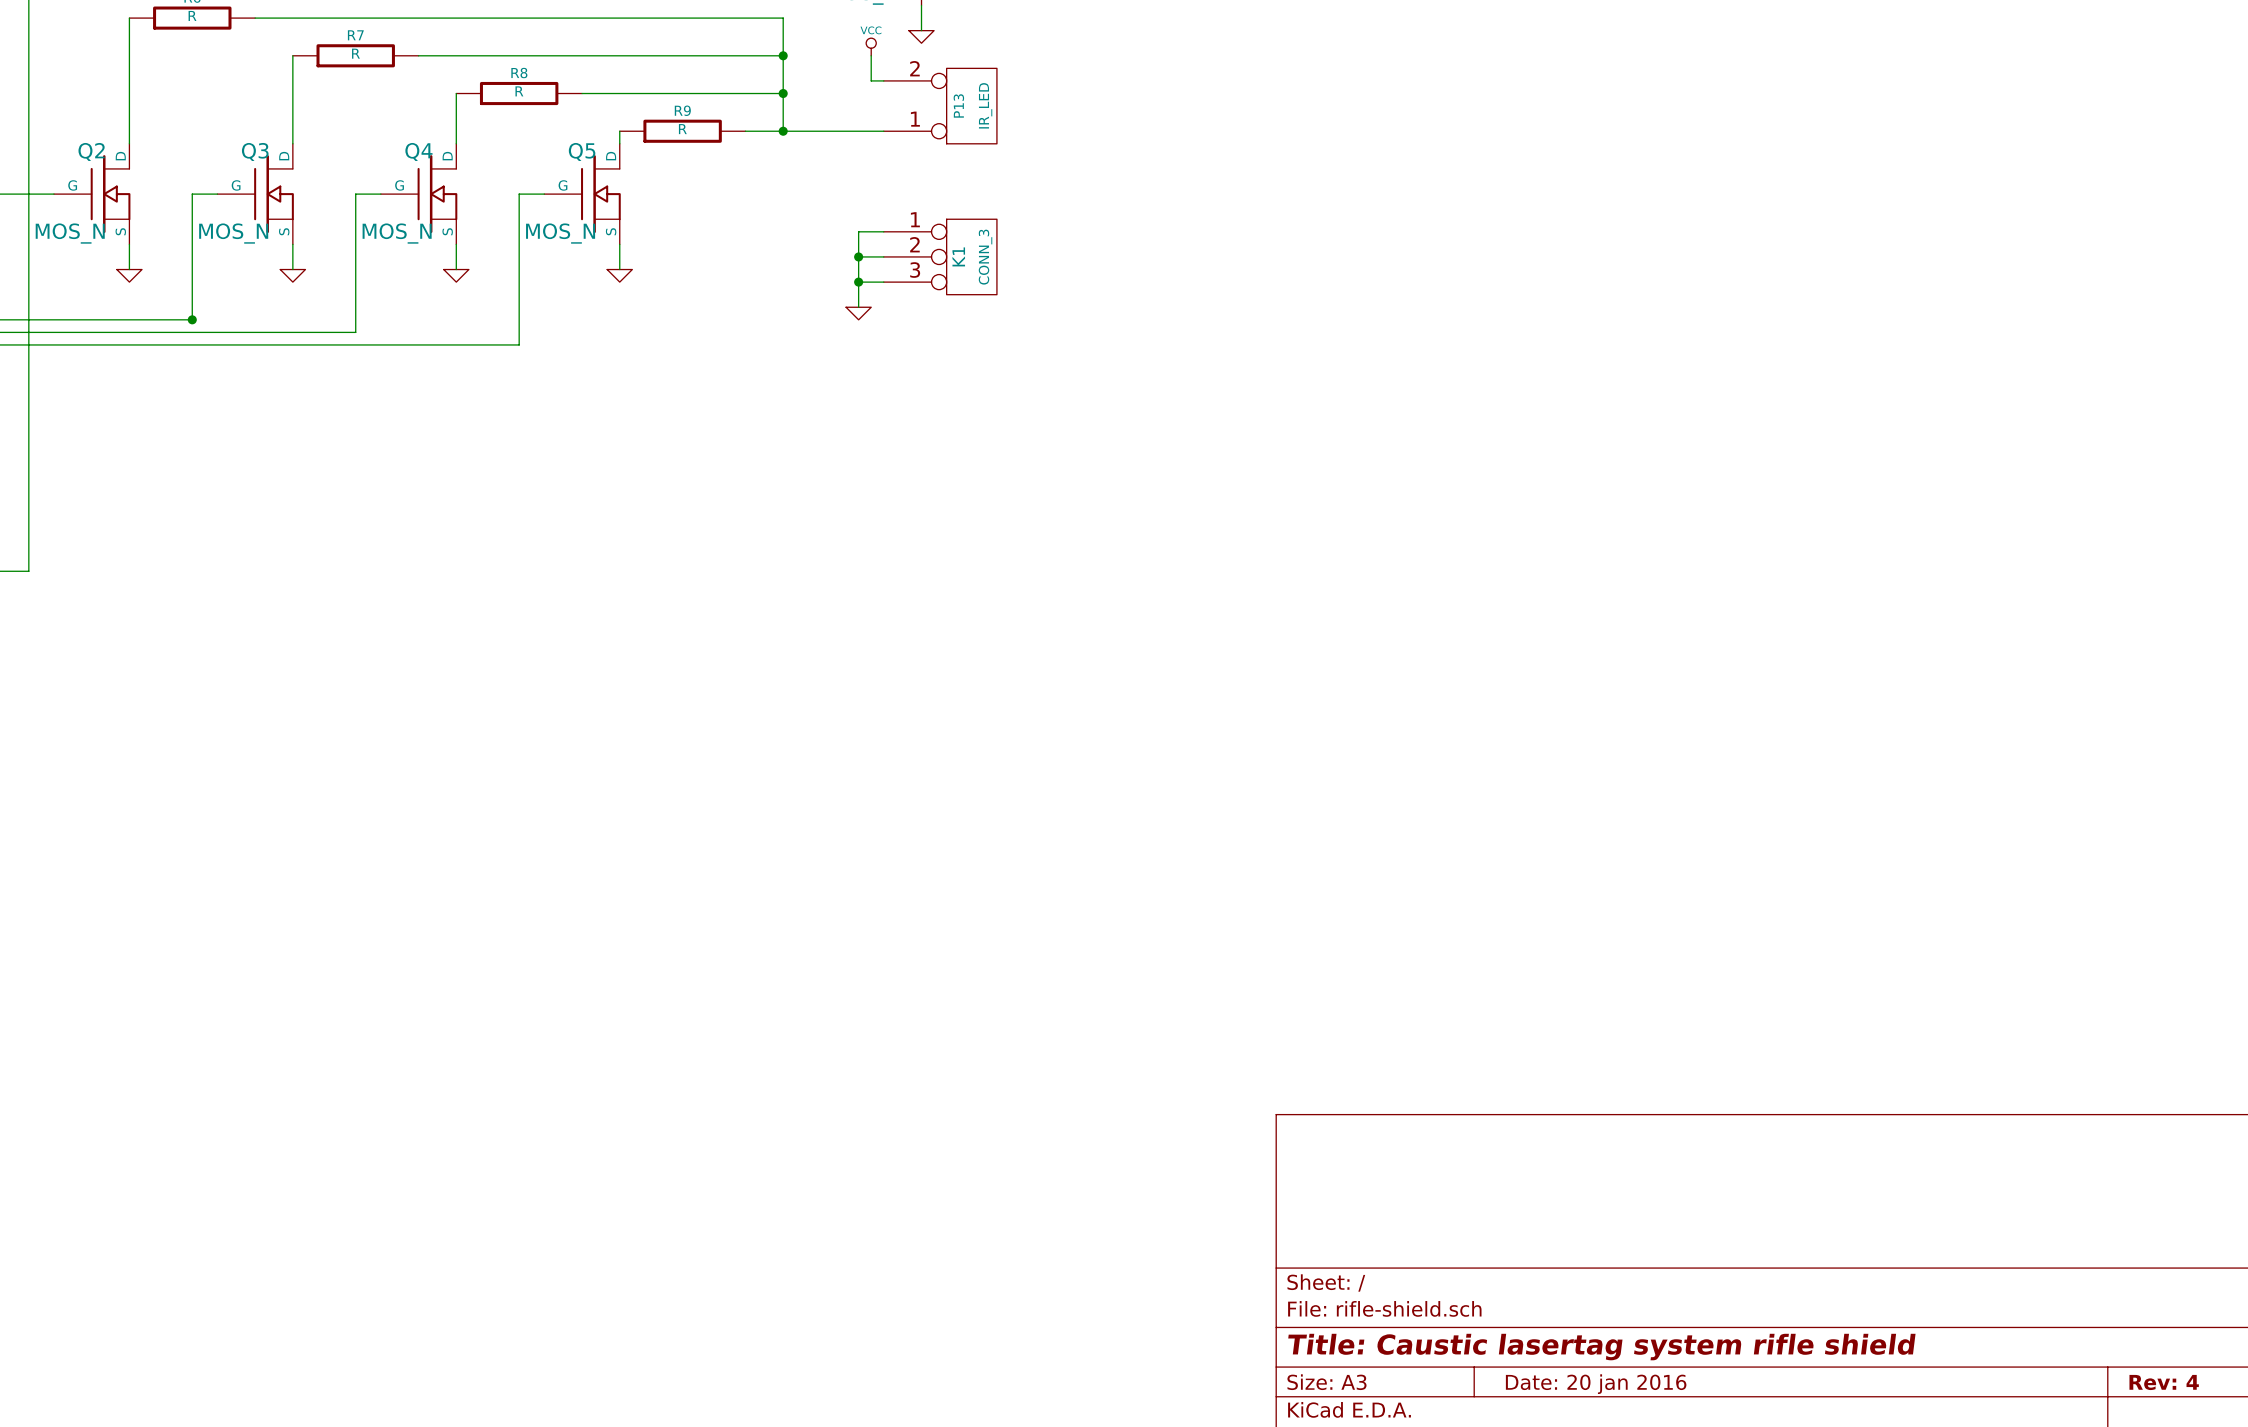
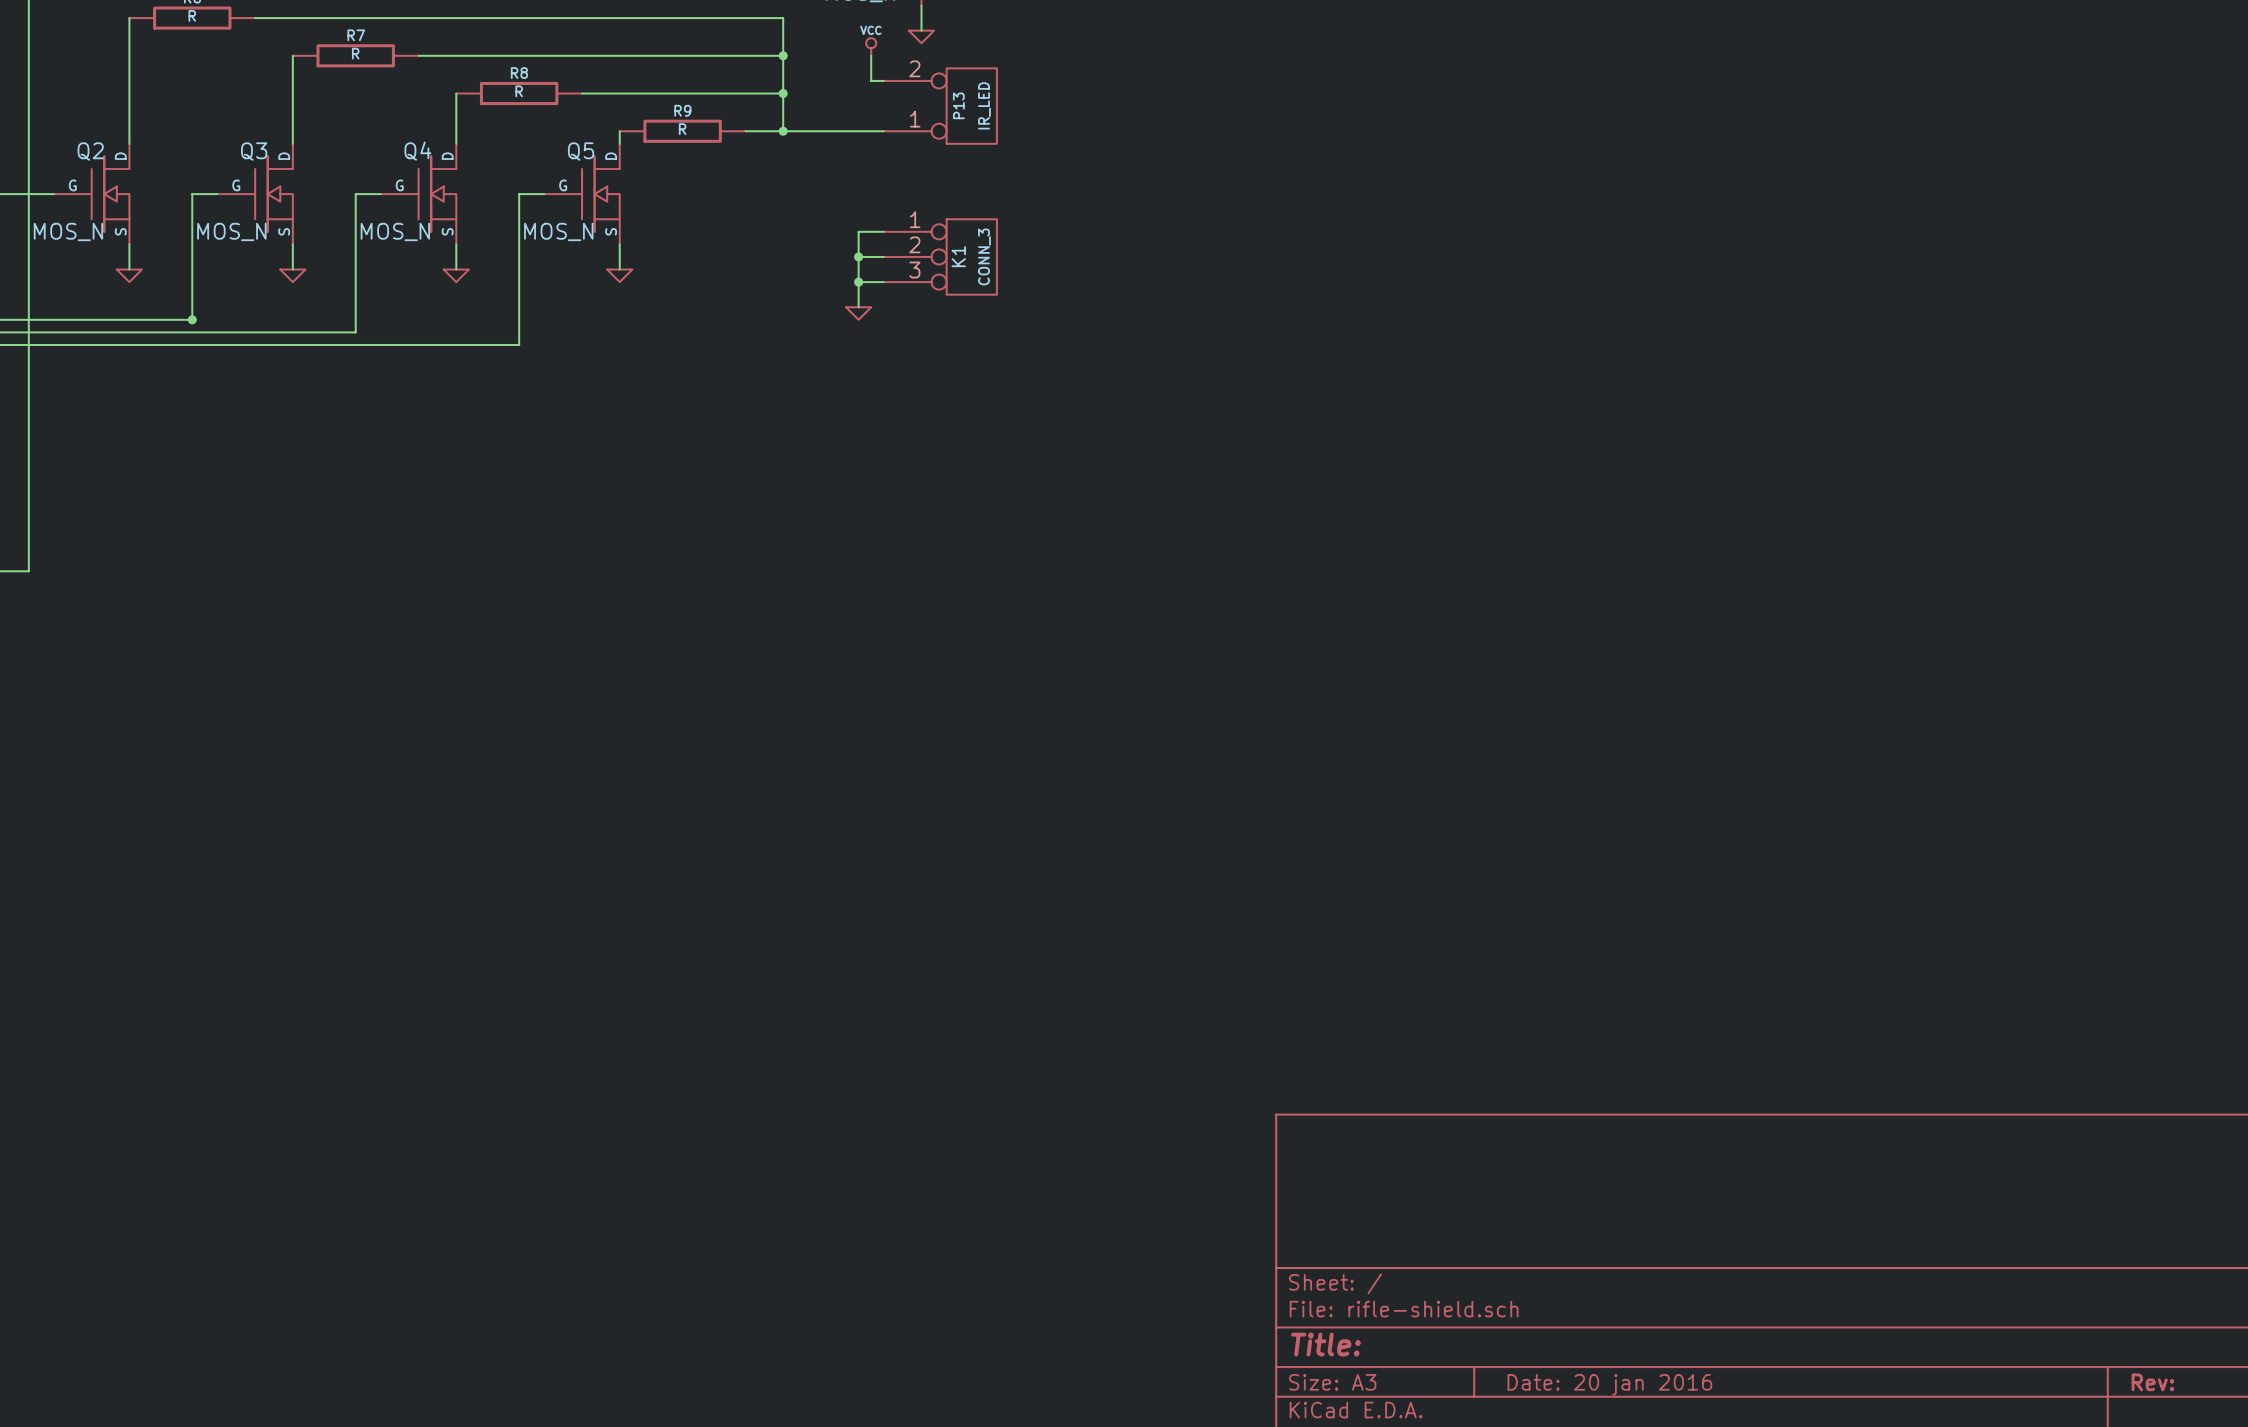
title block: Title: Caustic lasertag system rifle shield (1601, 1347) -> Title: (1326, 1344)
title block: Rev: 4 (2164, 1382) -> Rev: (2152, 1382)

